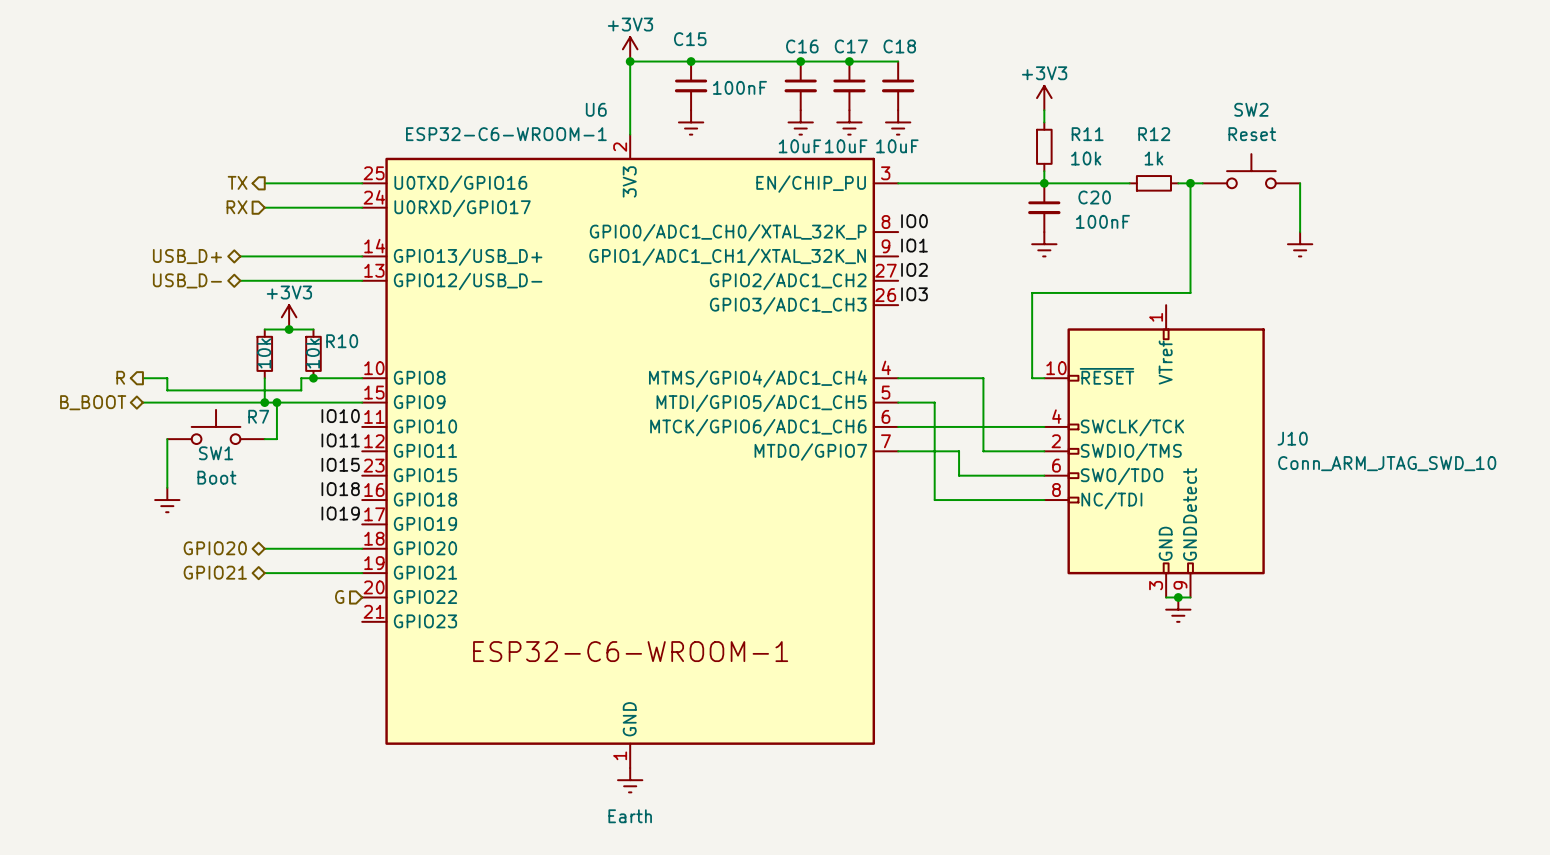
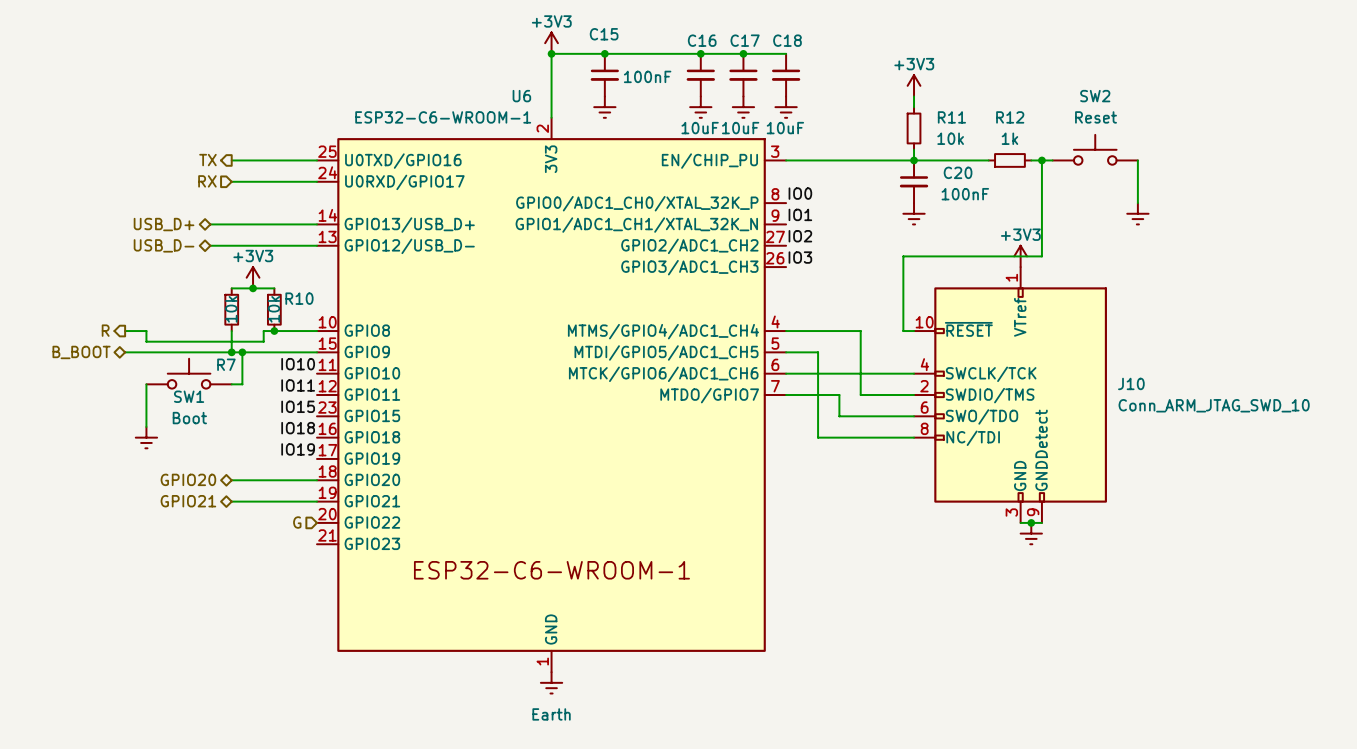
power symbol: none -> +3V3 (1020, 256)

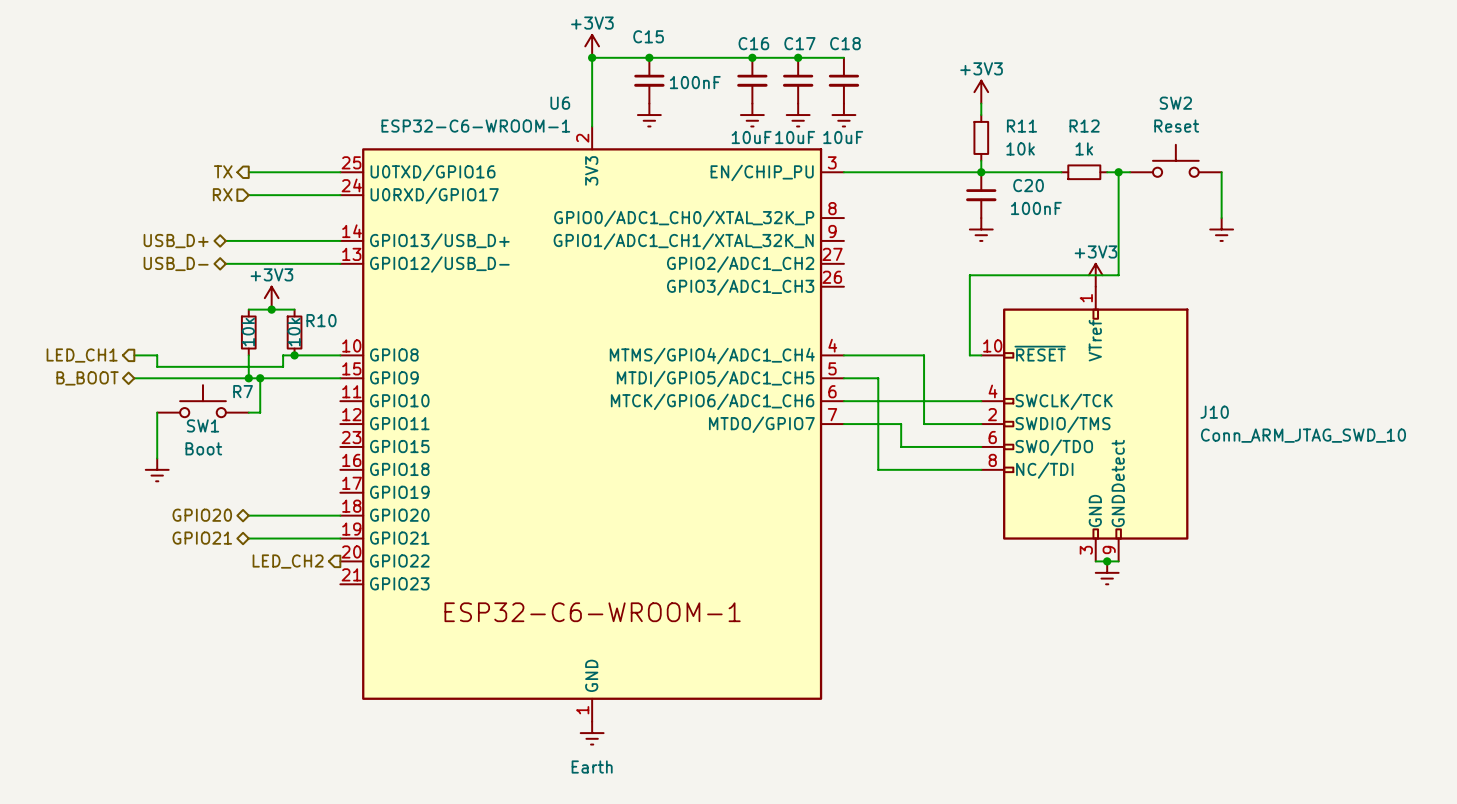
label: IO0 (800, 193) -> none
label: IO1 (800, 214) -> none
label: IO2 (800, 236) -> none
label: IO3 (800, 257) -> none
hierarchical label: R (105, 330) -> LED_CH1 (82, 355)
label: IO10 (298, 364) -> none
label: IO11 (298, 385) -> none
label: IO15 (298, 406) -> none
label: IO18 (298, 428) -> none
label: IO19 (298, 449) -> none
hierarchical label shape: input (297, 522) -> output (288, 561)
hierarchical label: G (297, 522) -> LED_CH2 (288, 561)

